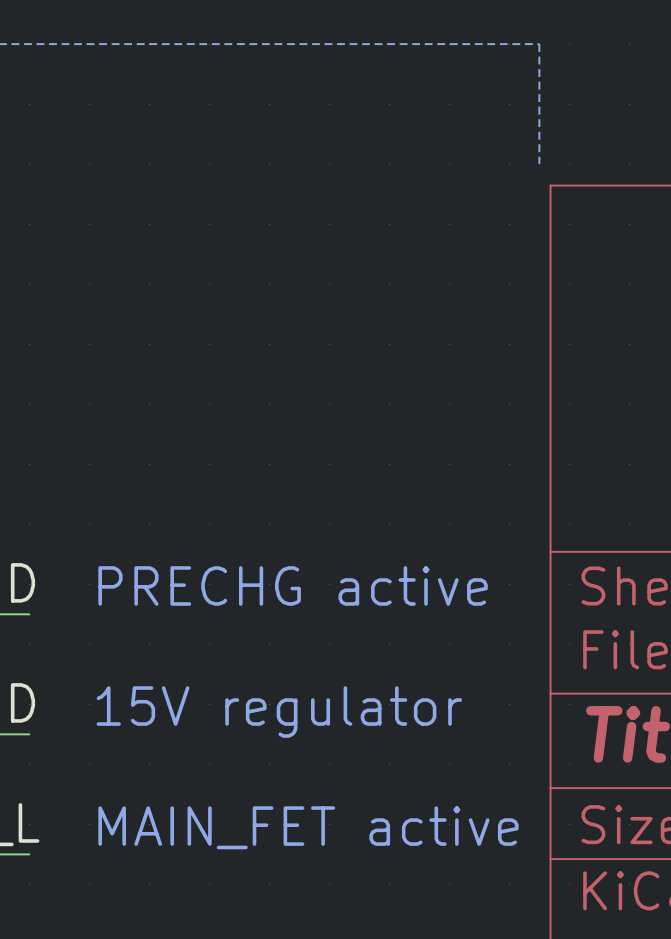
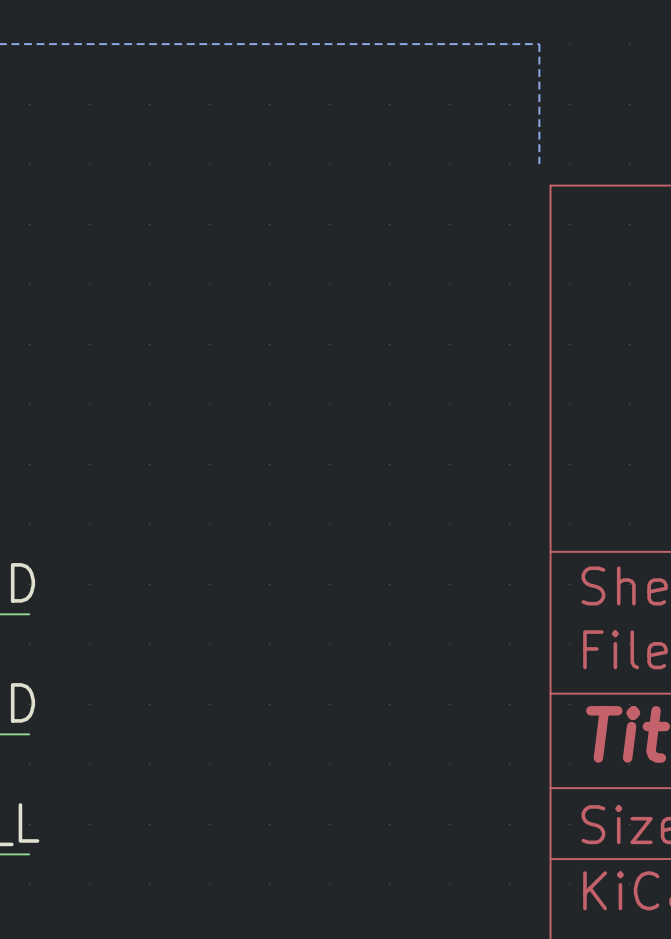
text: PRECHG active (293, 585) -> none
text: 15V regulator (279, 712) -> none
text: MAIN_FET active (308, 827) -> none

